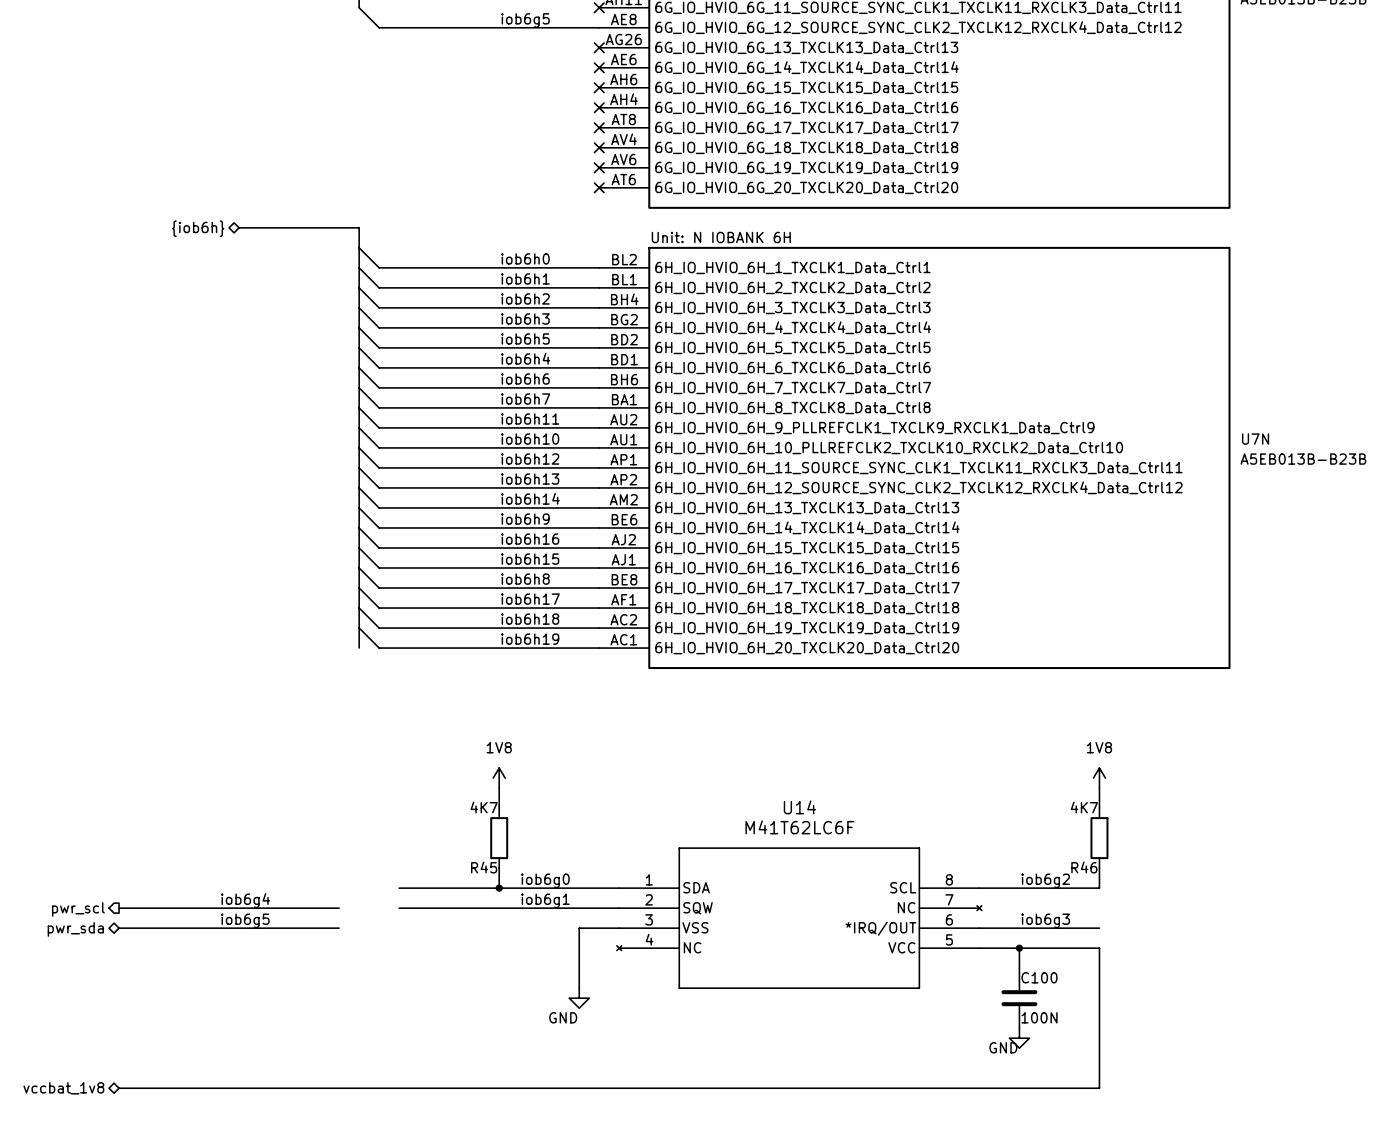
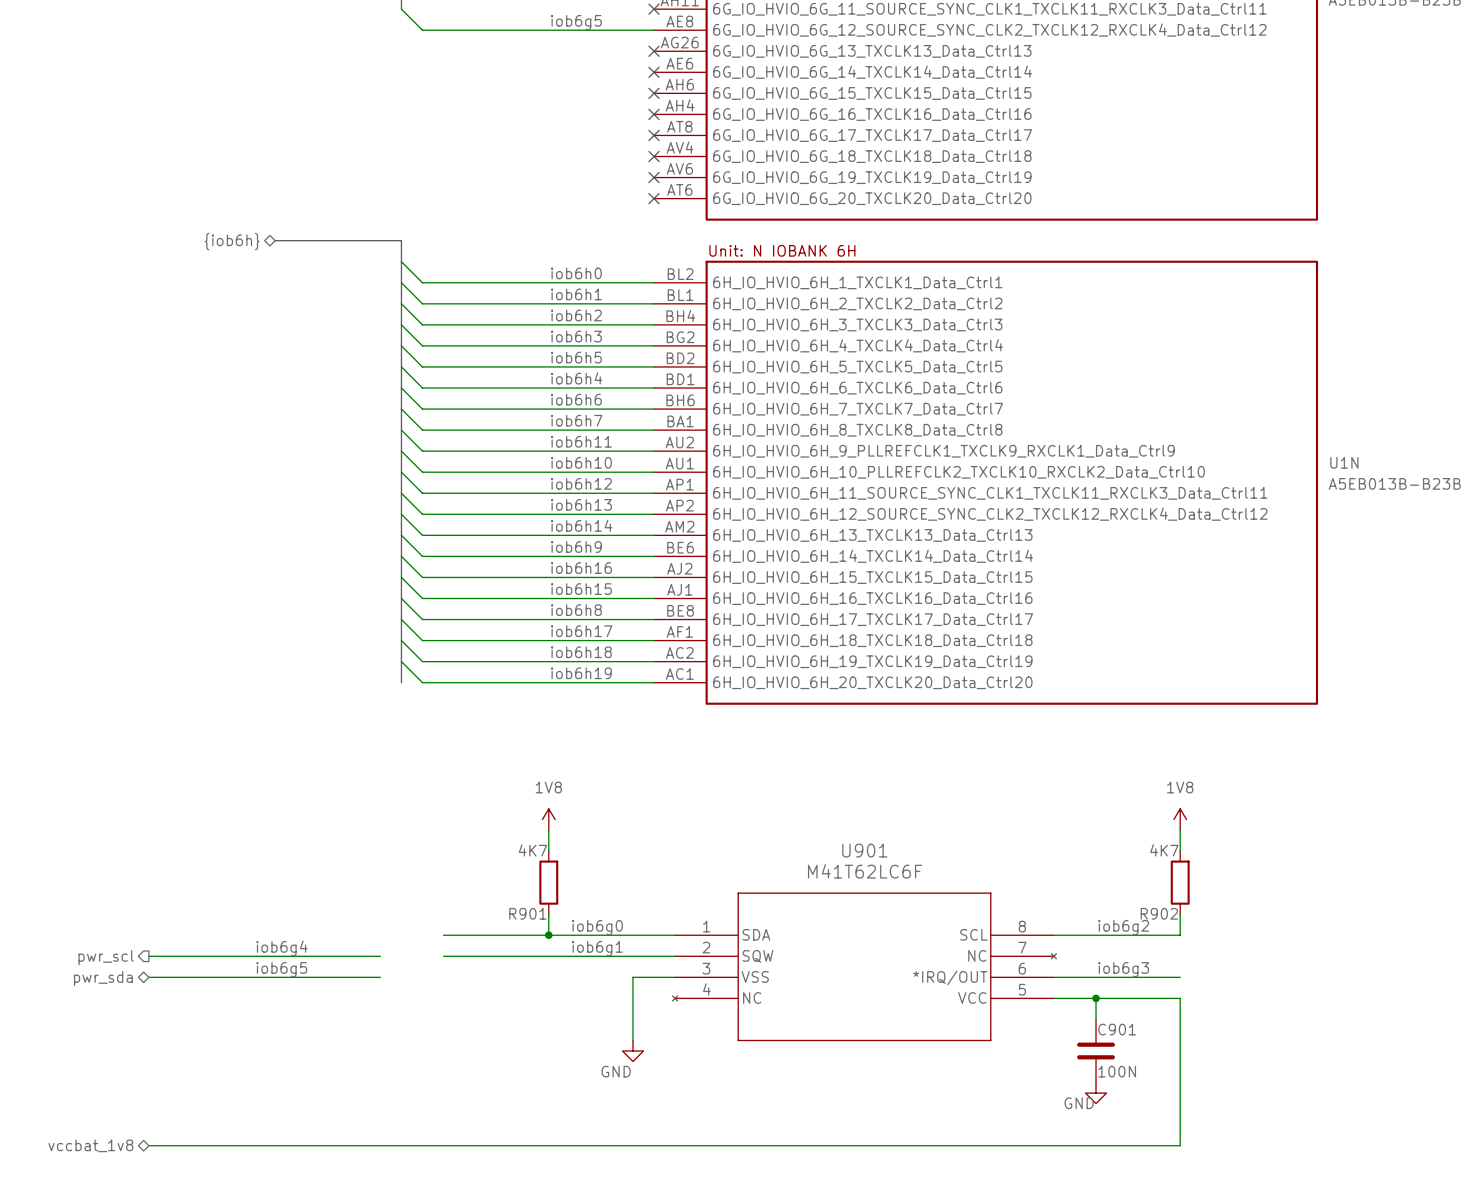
U7N name: U7N (1255, 439) -> U1N (1344, 462)
U14 name: U14 (799, 807) -> U901 (864, 850)
R45 name: R45 (484, 867) -> R901 (527, 913)
R46 name: R46 (1084, 867) -> R902 (1159, 913)
C100 name: C100 (1039, 977) -> C901 (1117, 1029)

